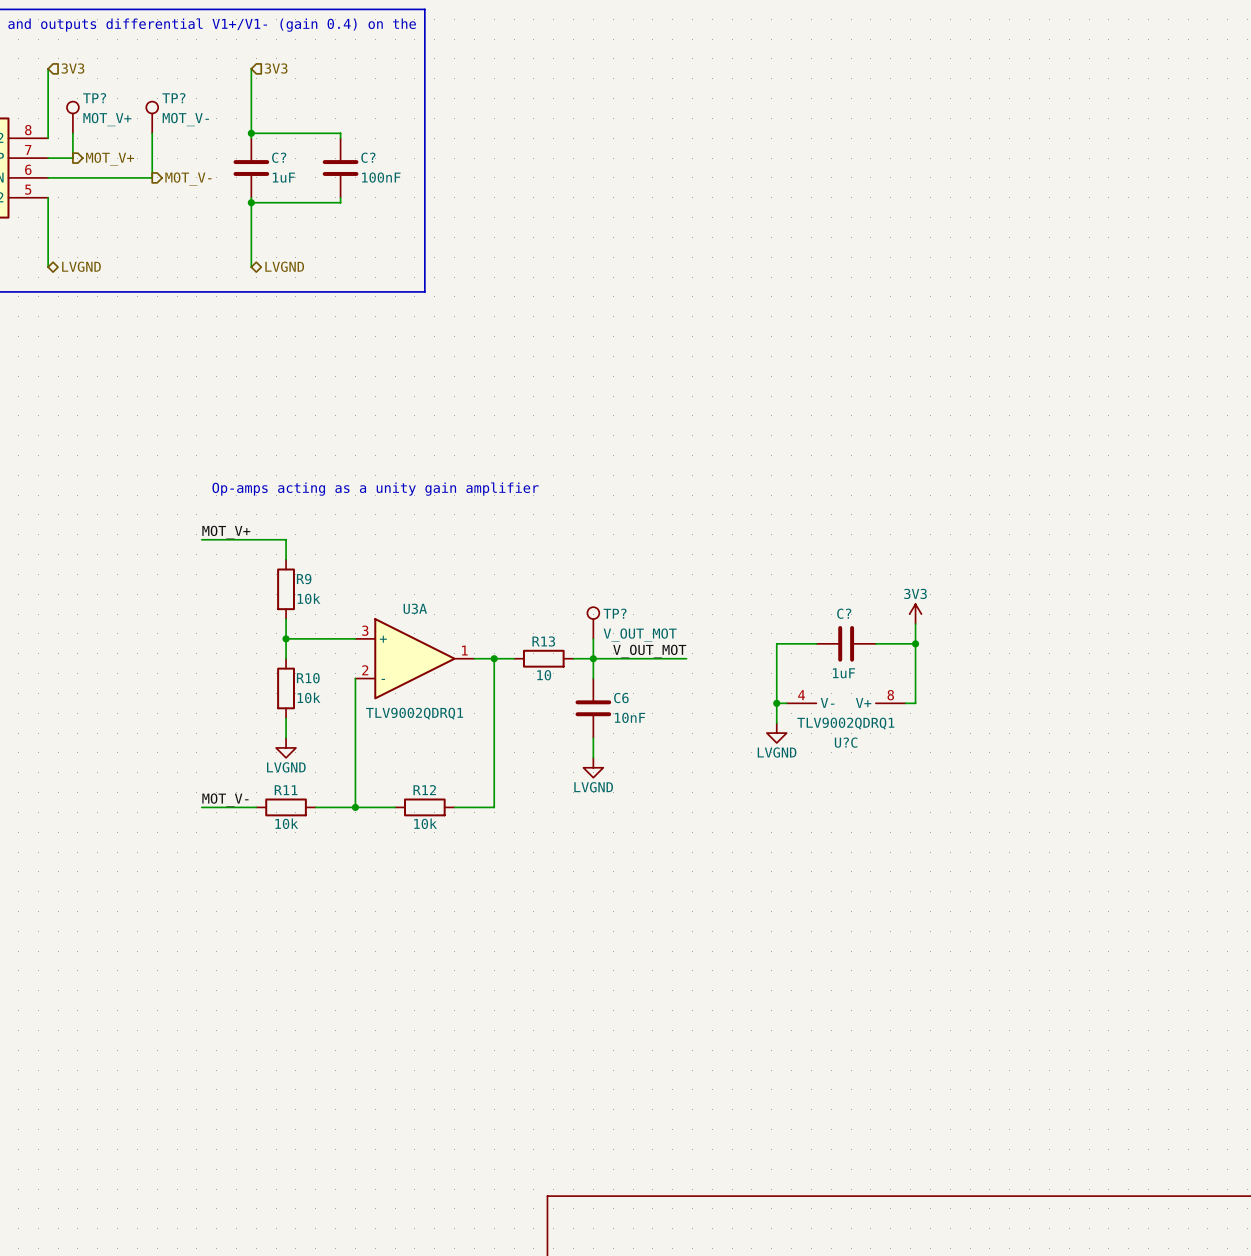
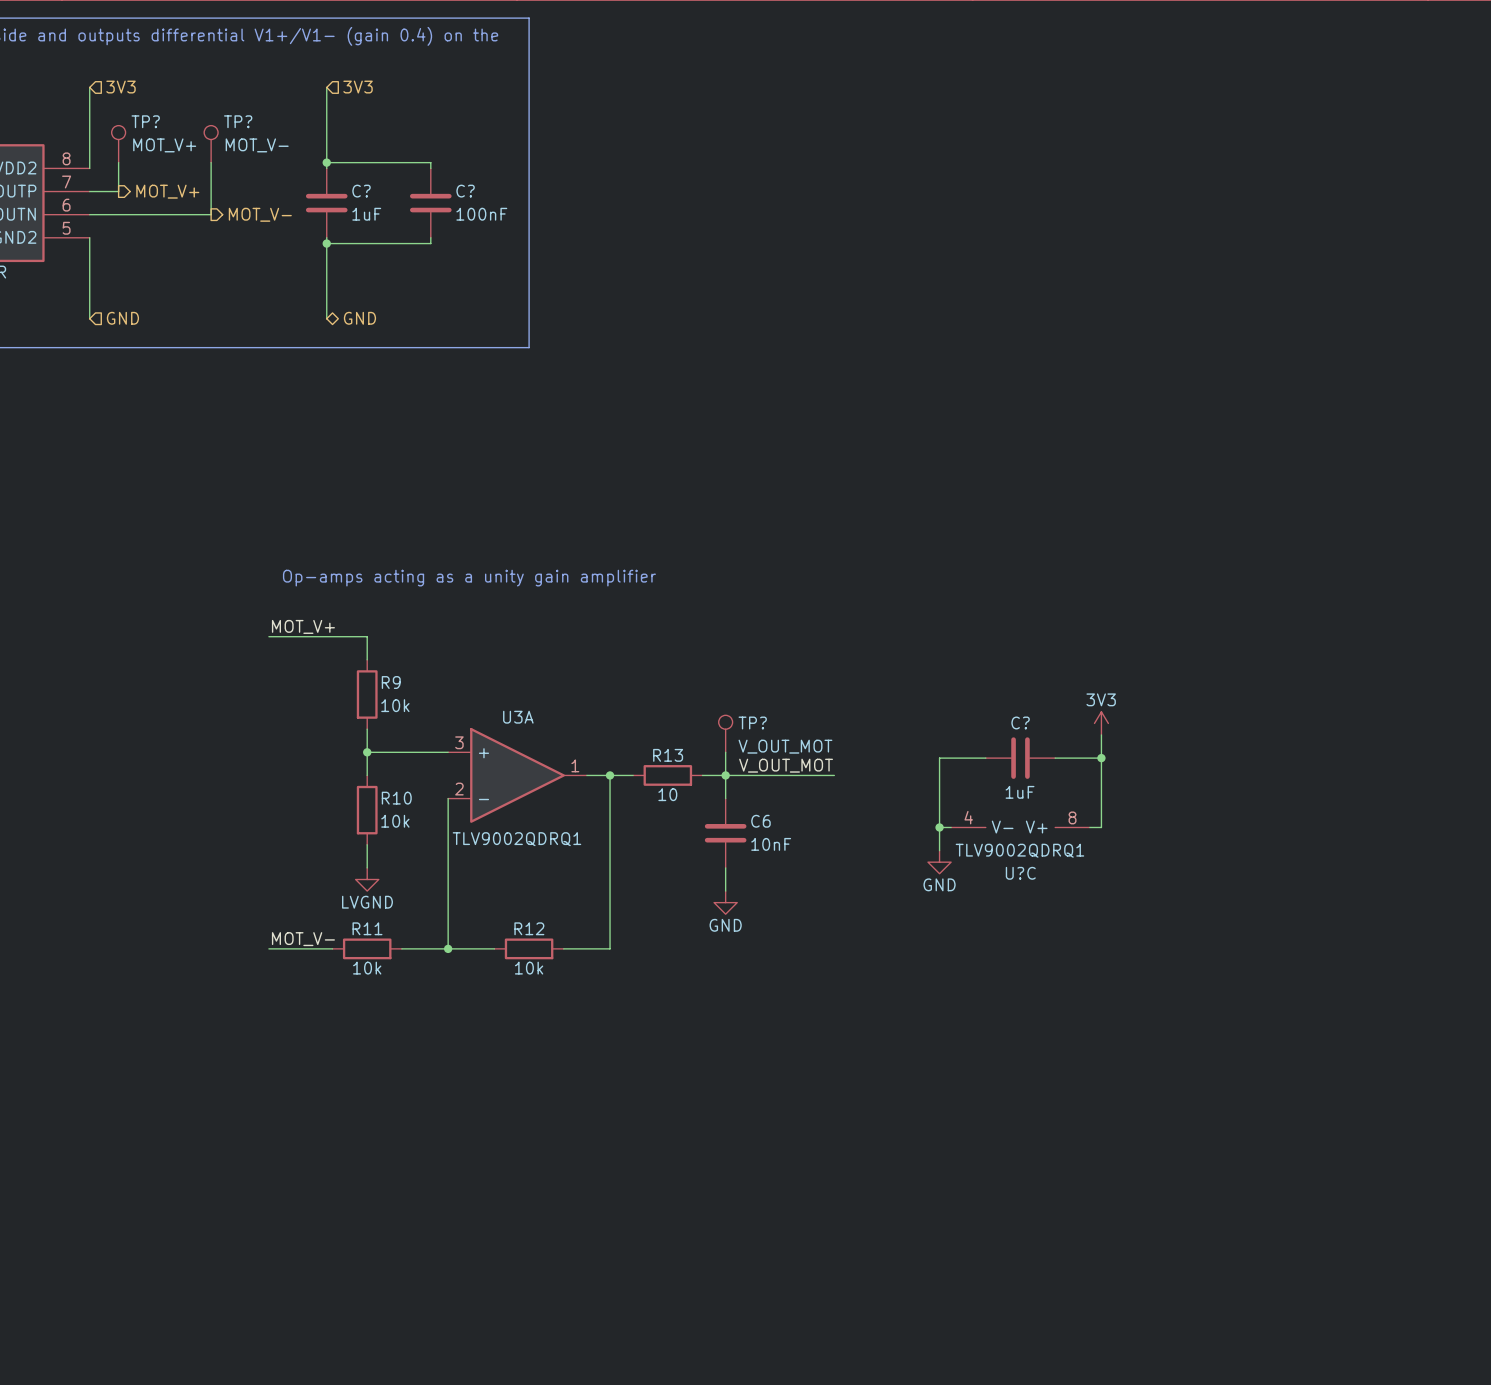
hierarchical label shape: bidirectional (81, 266) -> input (122, 318)
hierarchical label: LVGND (81, 266) -> GND (122, 318)
hierarchical label: LVGND (284, 266) -> GND (359, 318)
power symbol: LVGND (776, 733) -> GND (939, 862)
power symbol: LVGND (593, 767) -> GND (725, 902)

